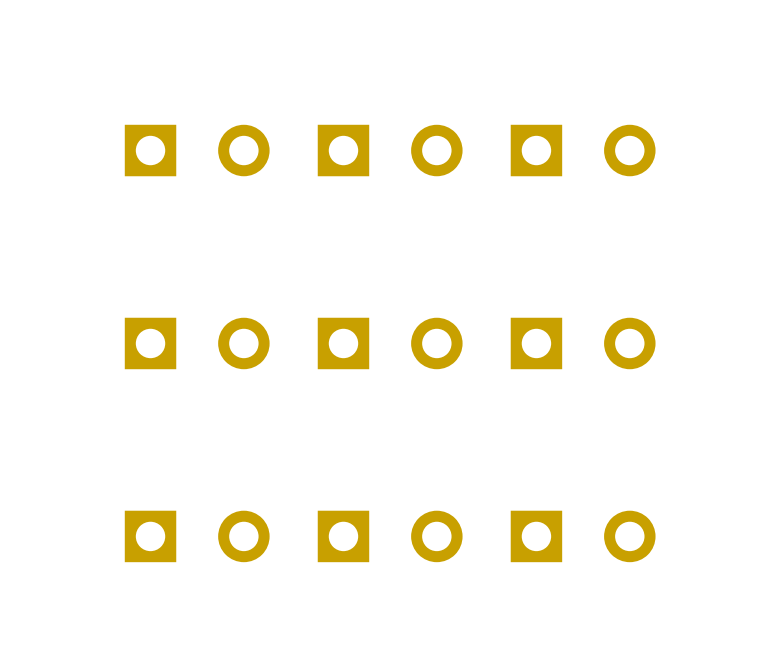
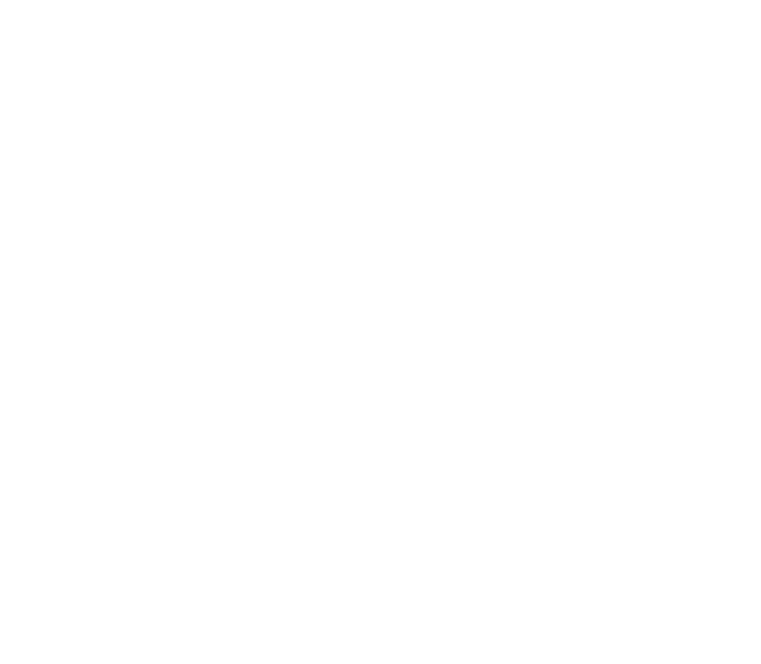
part: (197, 150) -> none
part: (390, 150) -> none
part: (583, 150) -> none
part: (197, 343) -> none
part: (390, 343) -> none
part: (583, 343) -> none
part: (197, 536) -> none
part: (390, 536) -> none
part: (583, 536) -> none

